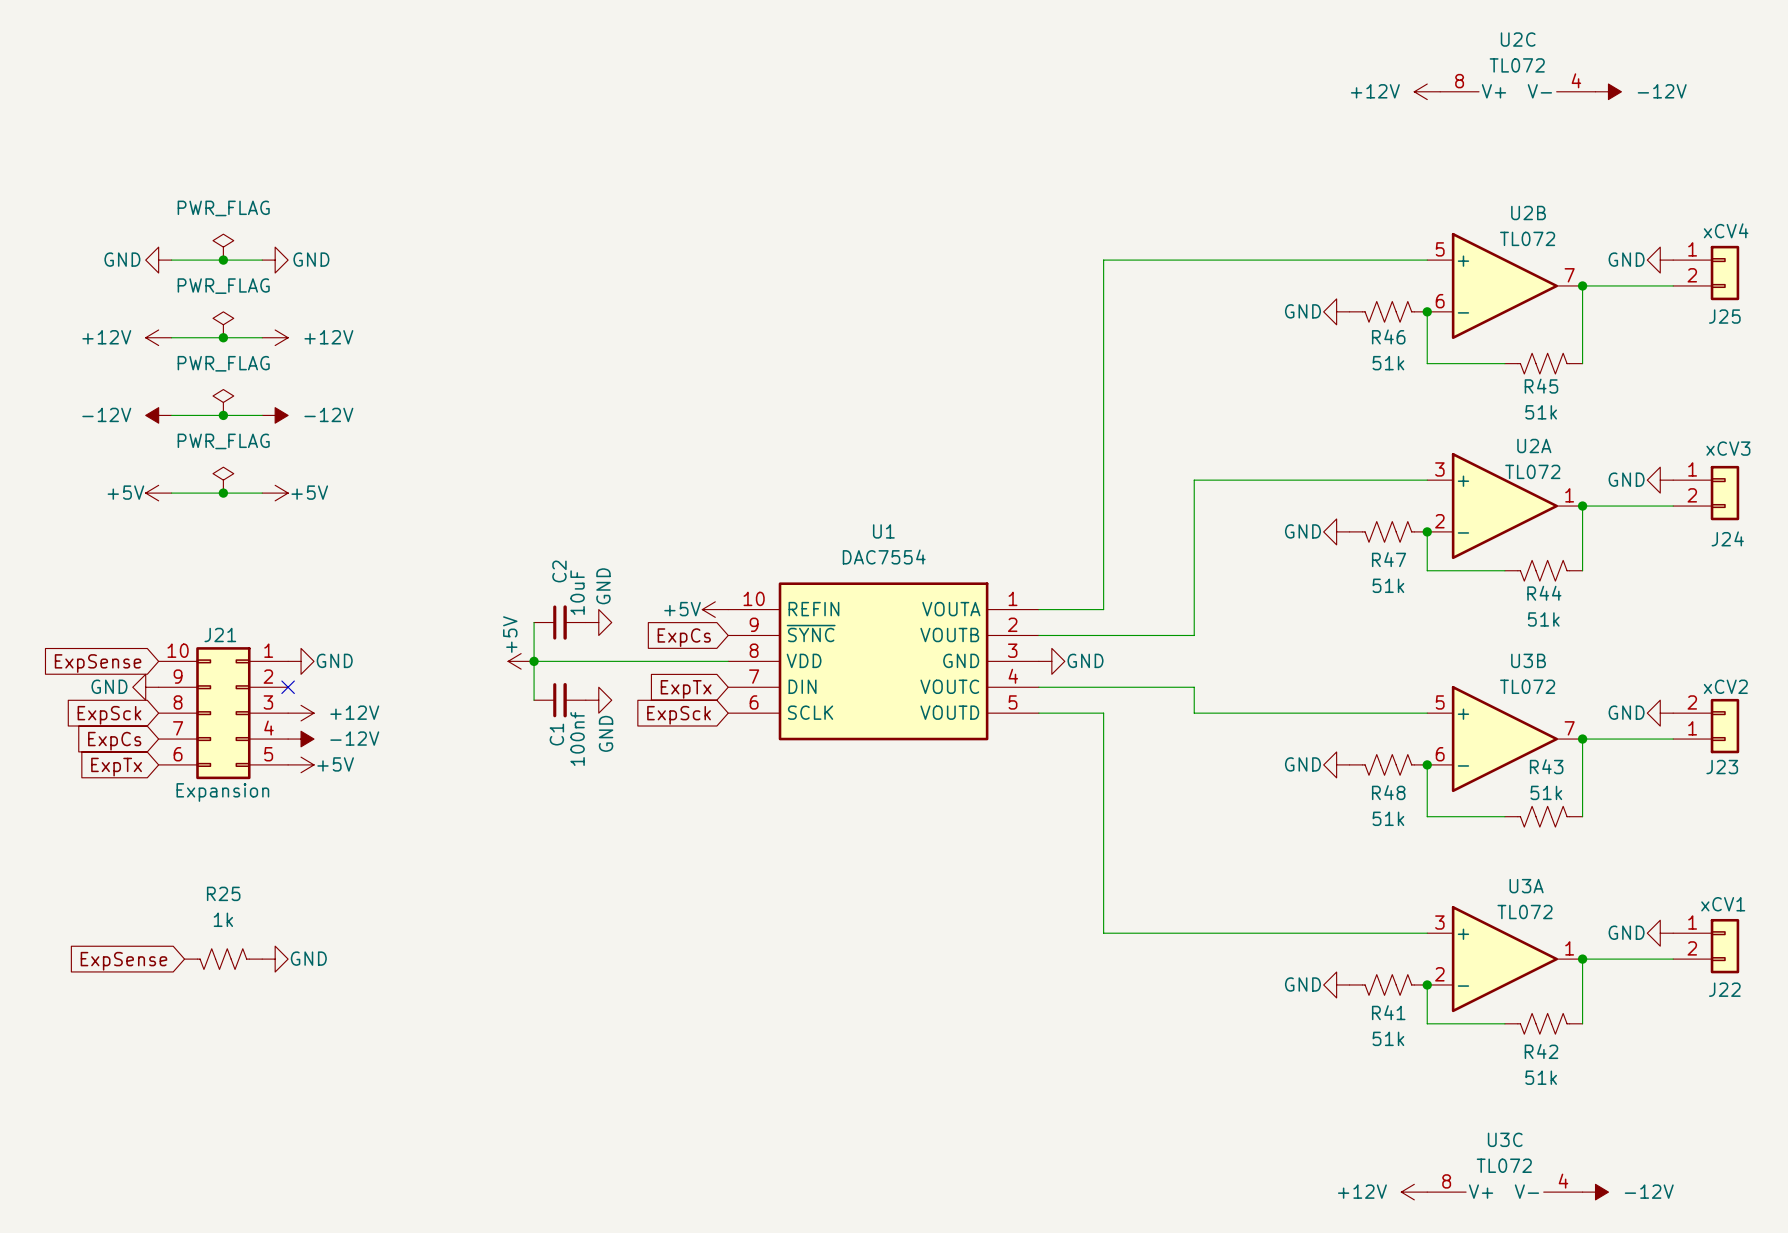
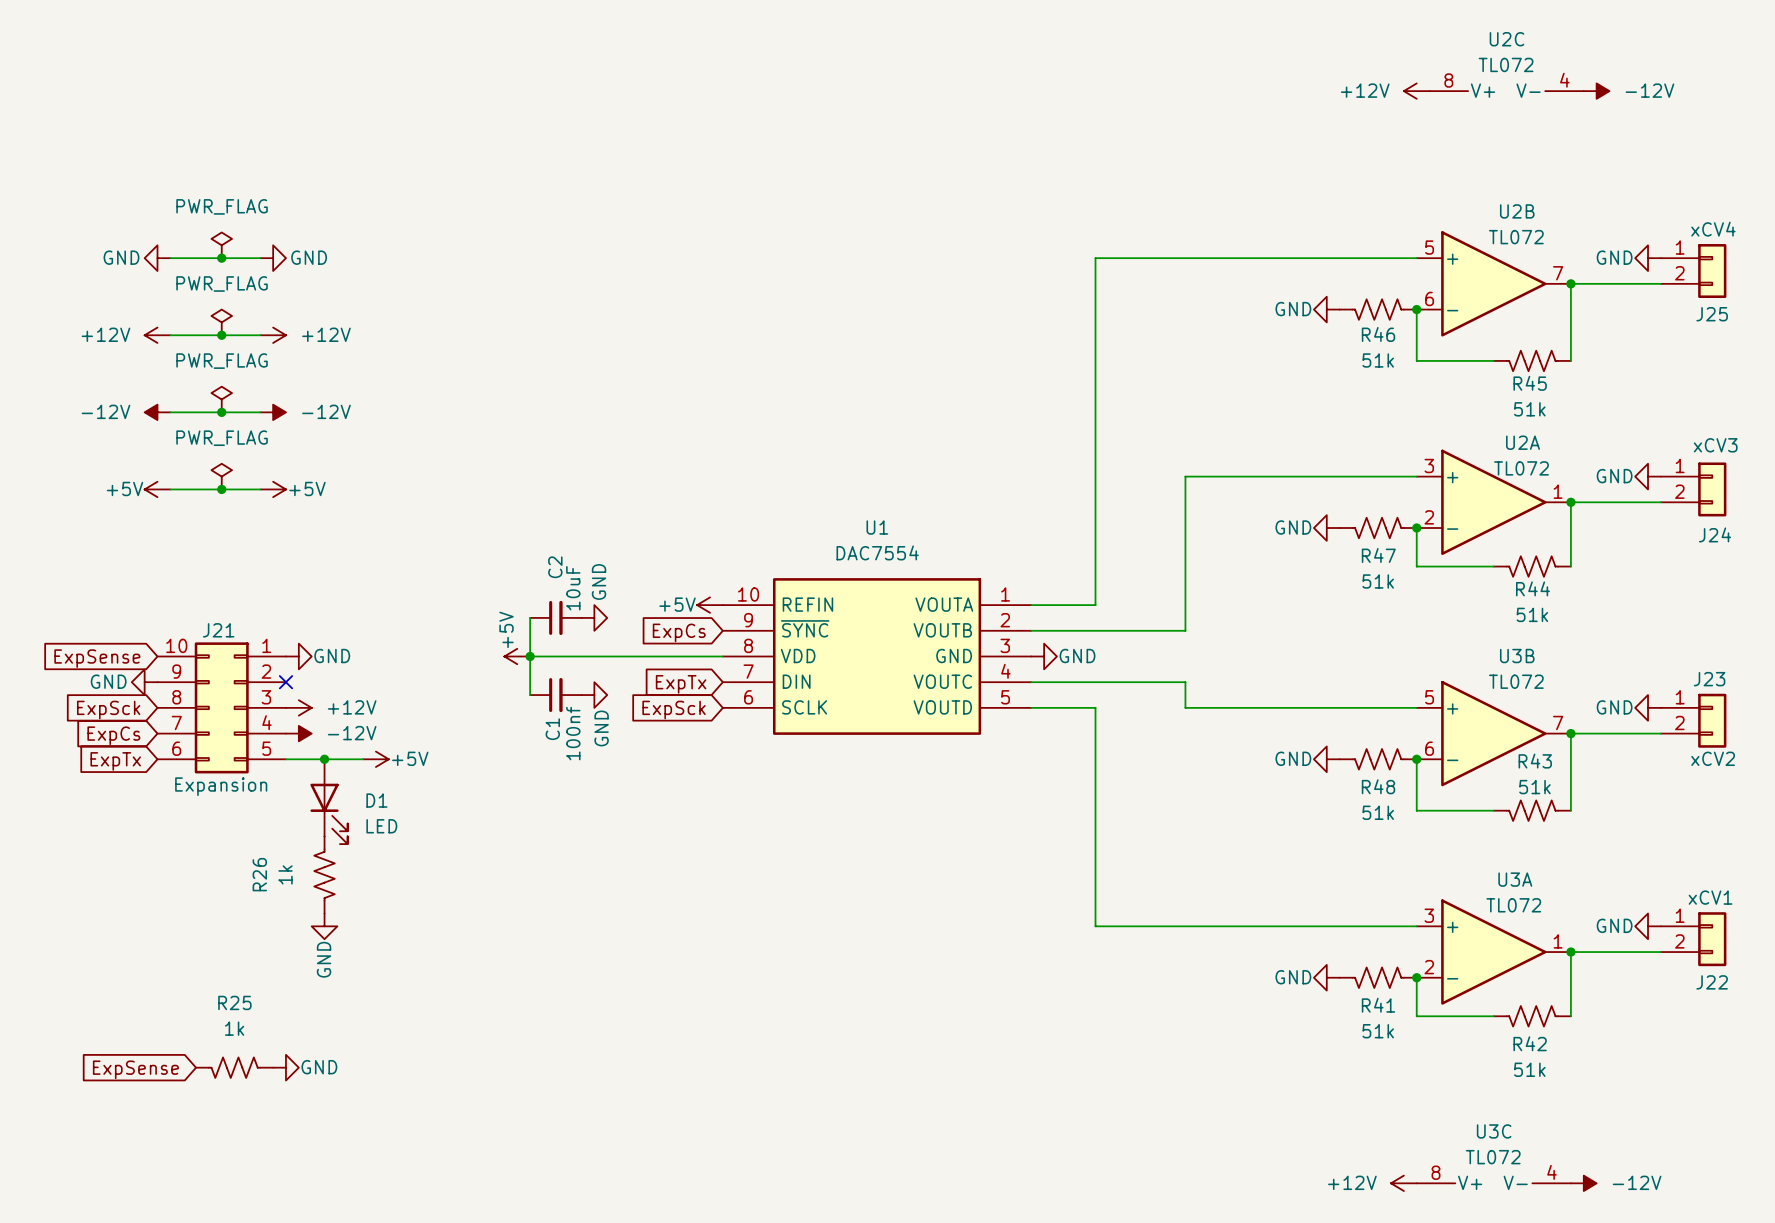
J23 flip: as is (1724, 726) -> up-down (1712, 720)
wire: none -> (285, 759) (363, 759)
power symbol position: +5V (301, 764) -> +5V (375, 759)
junction: none -> (324, 759)
D1: none -> LED (329, 801)
R26: none -> 1k (324, 874)
R25 position: (223, 959) -> (234, 1067)
power symbol rotation: 0° (275, 959) -> 90° clockwise (324, 926)
power symbol position: GND (275, 959) -> GND (324, 926)
global label position: ExpSense (123, 961) -> ExpSense (135, 1069)
power symbol: none -> GND (285, 1067)

